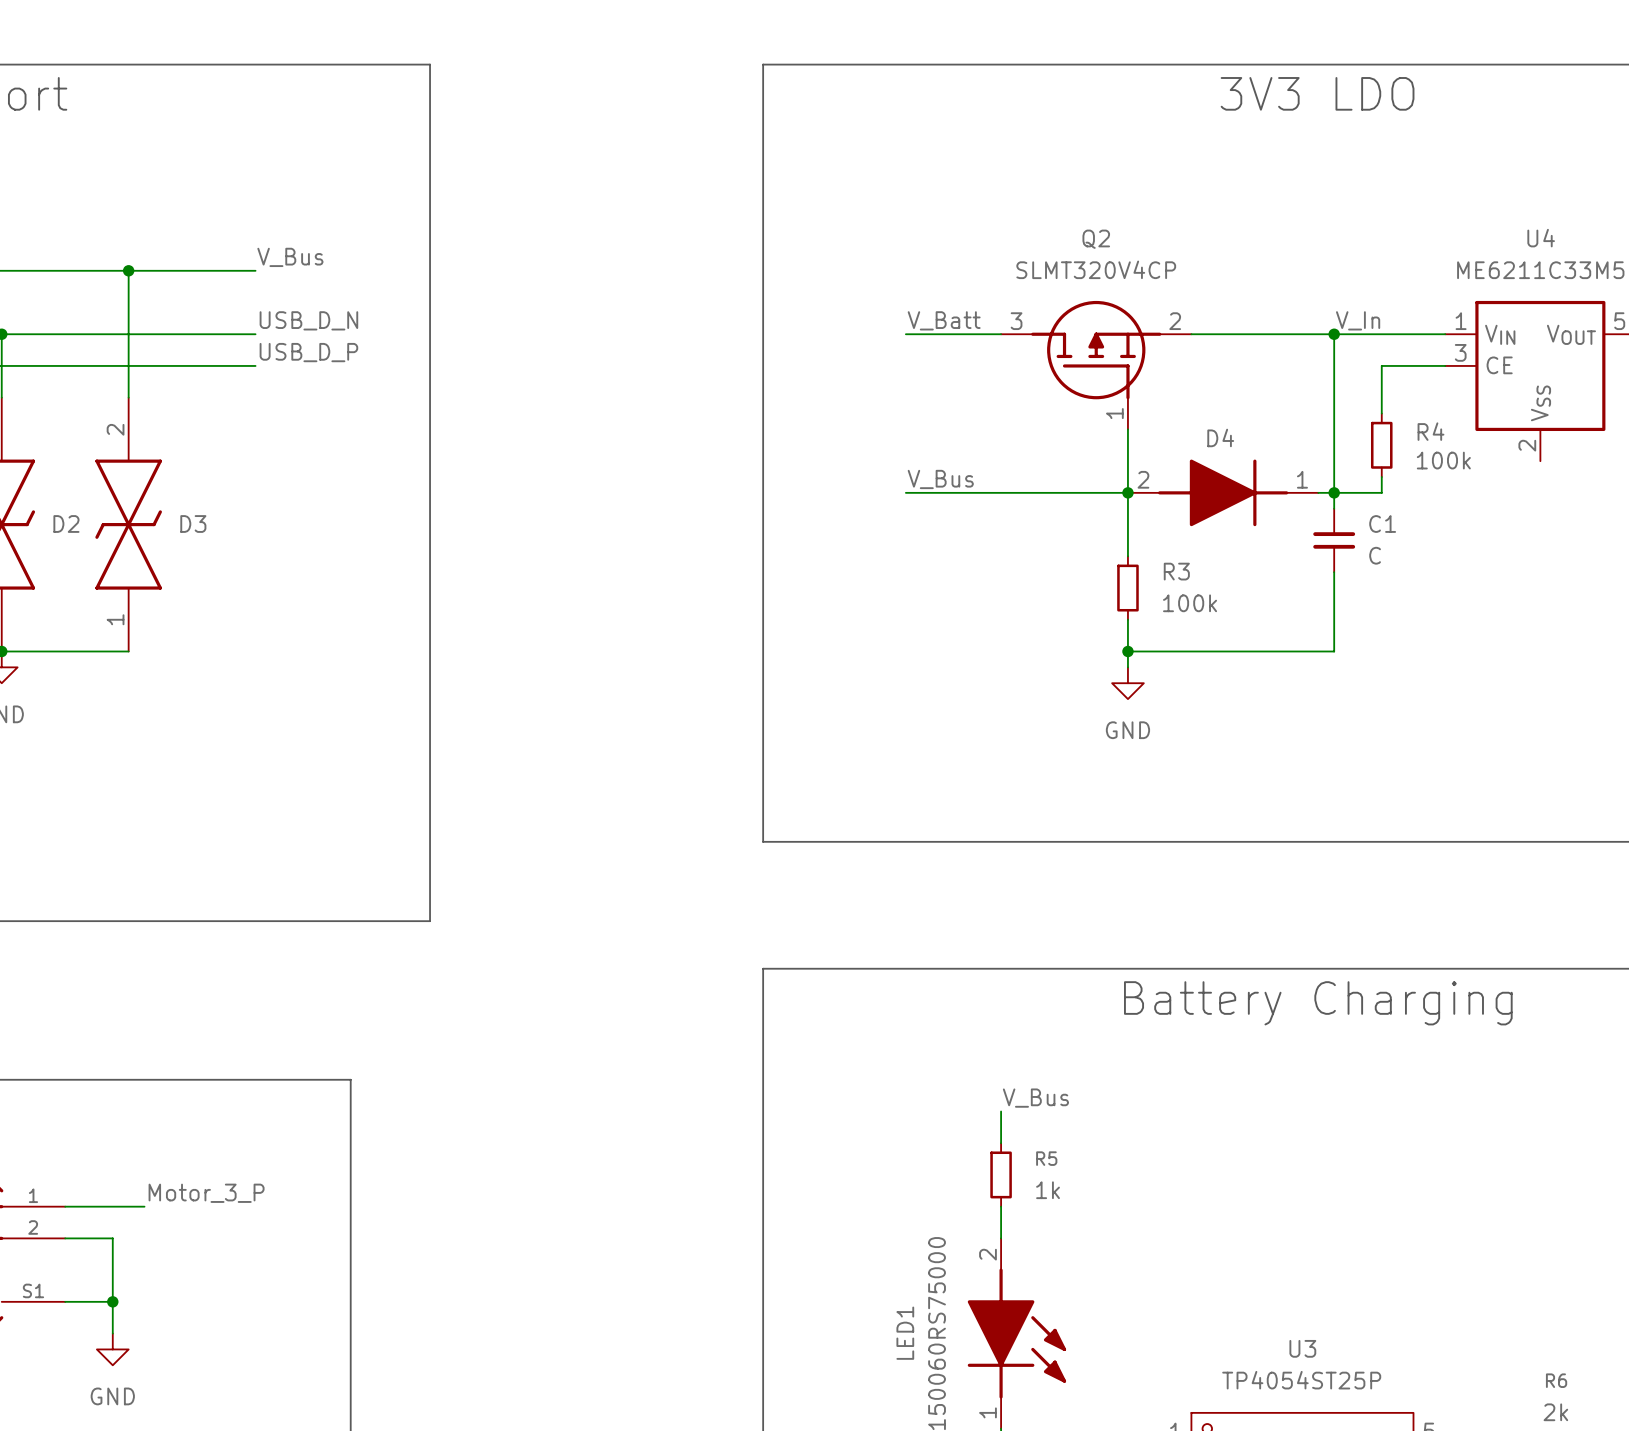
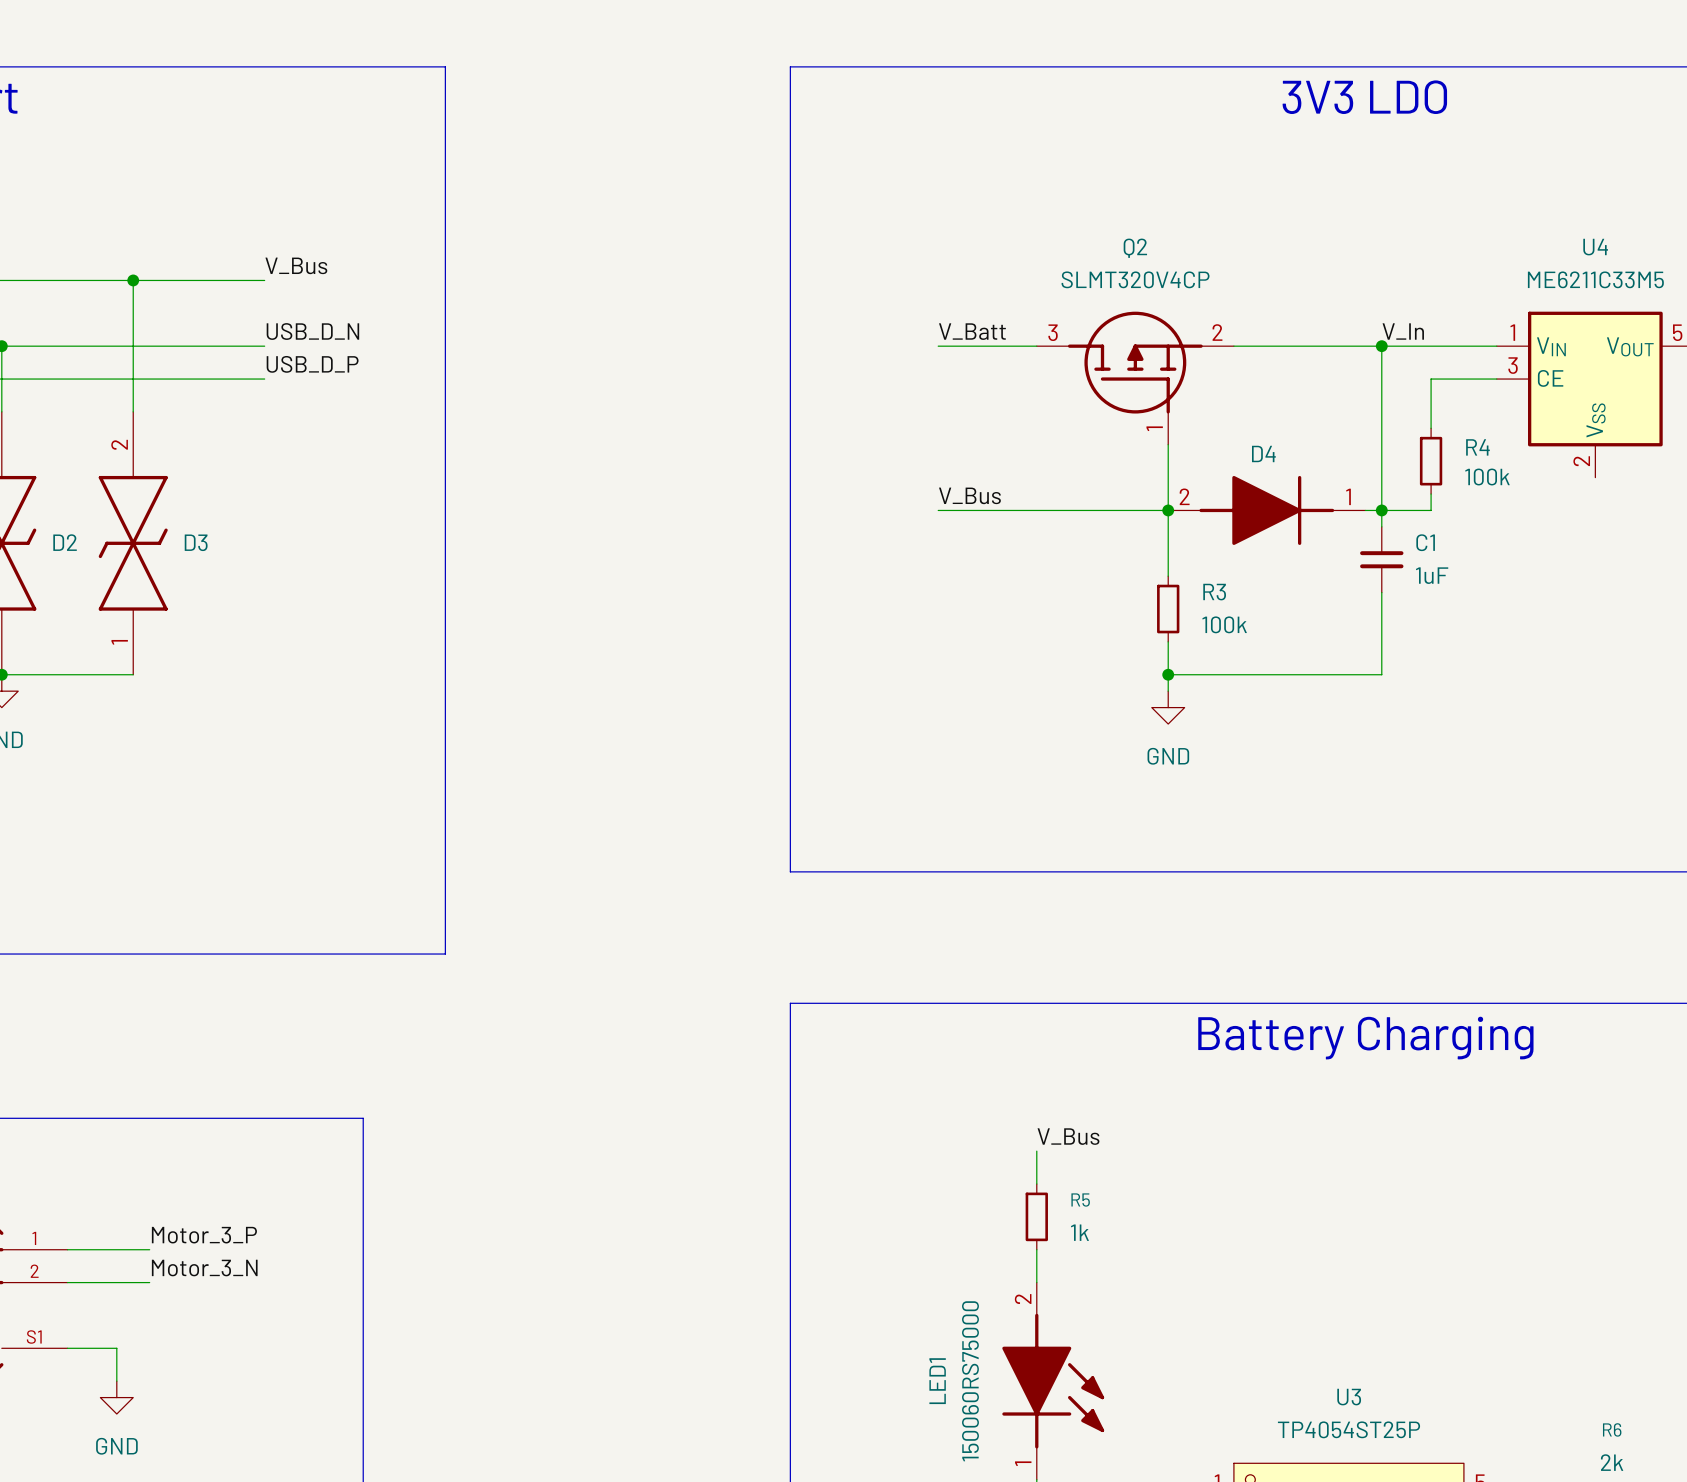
C1 value: C (1375, 555) -> 1uF (1432, 575)
label: none -> Motor_3_N (204, 1268)
wire: (112, 1238) (112, 1301) -> (116, 1282) (149, 1282)
junction: (112, 1301) -> none

